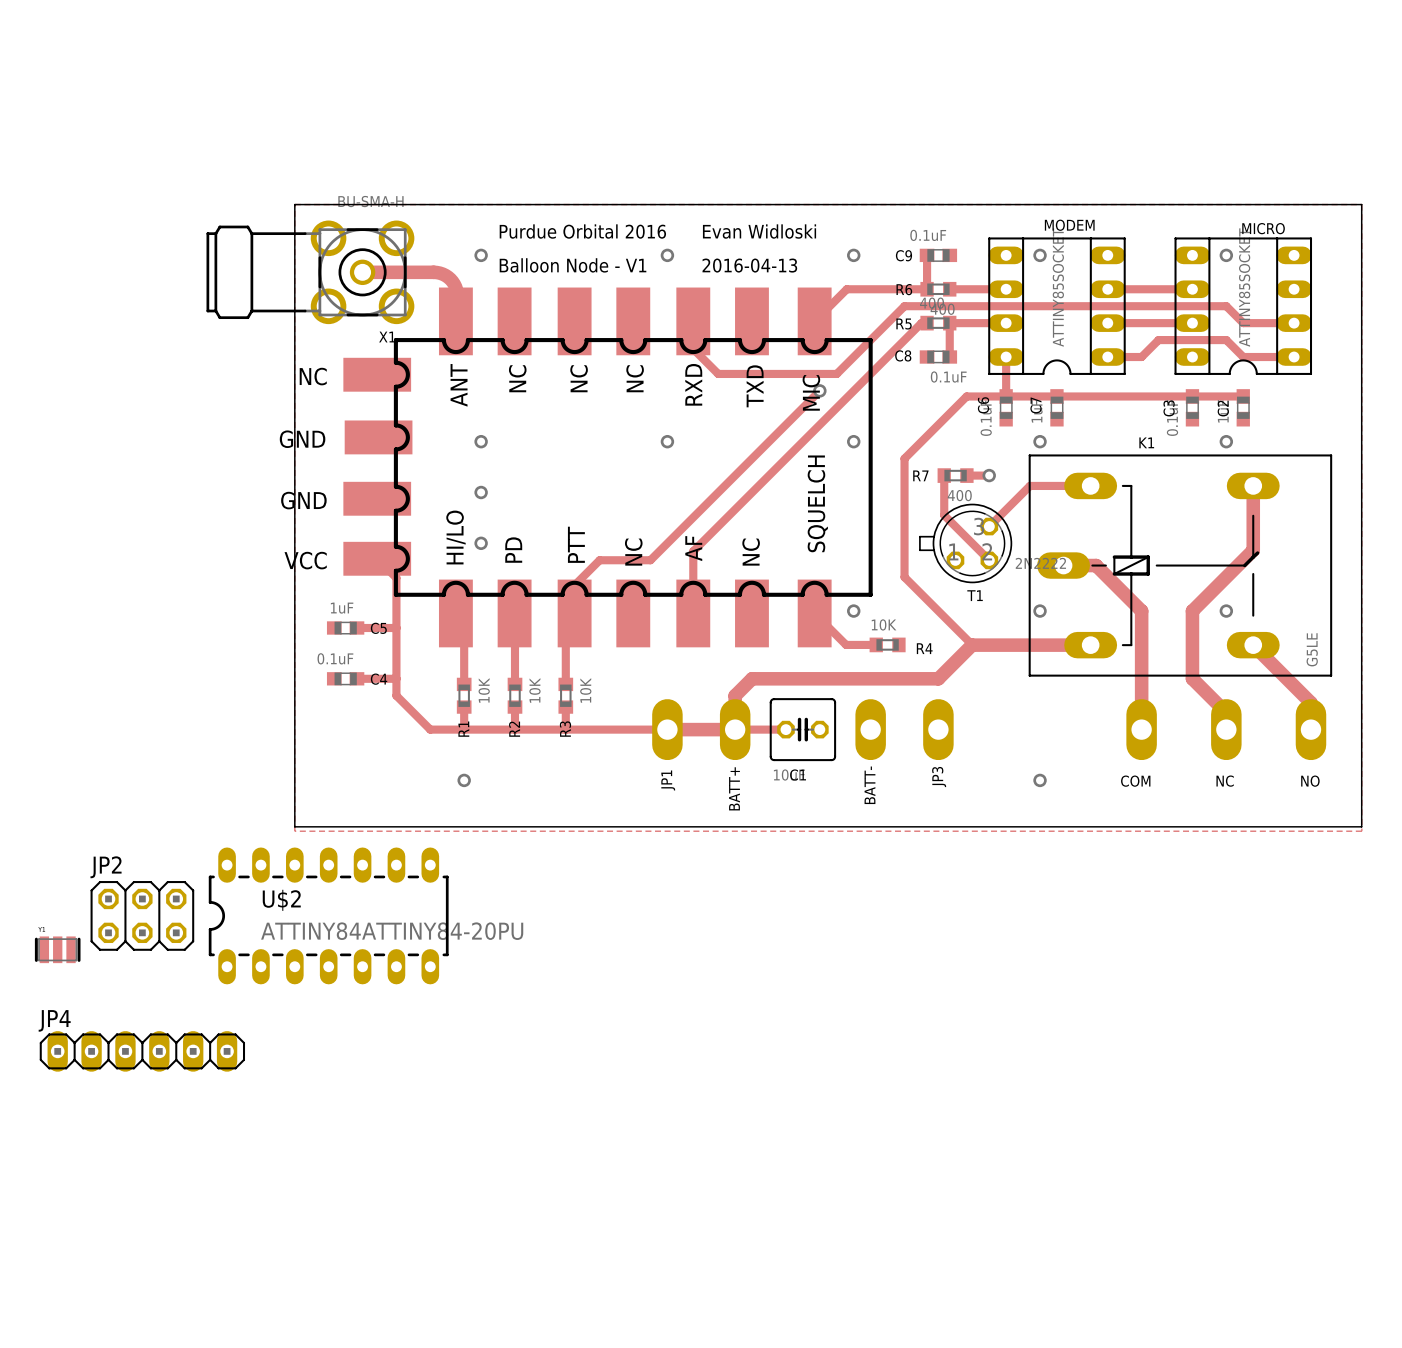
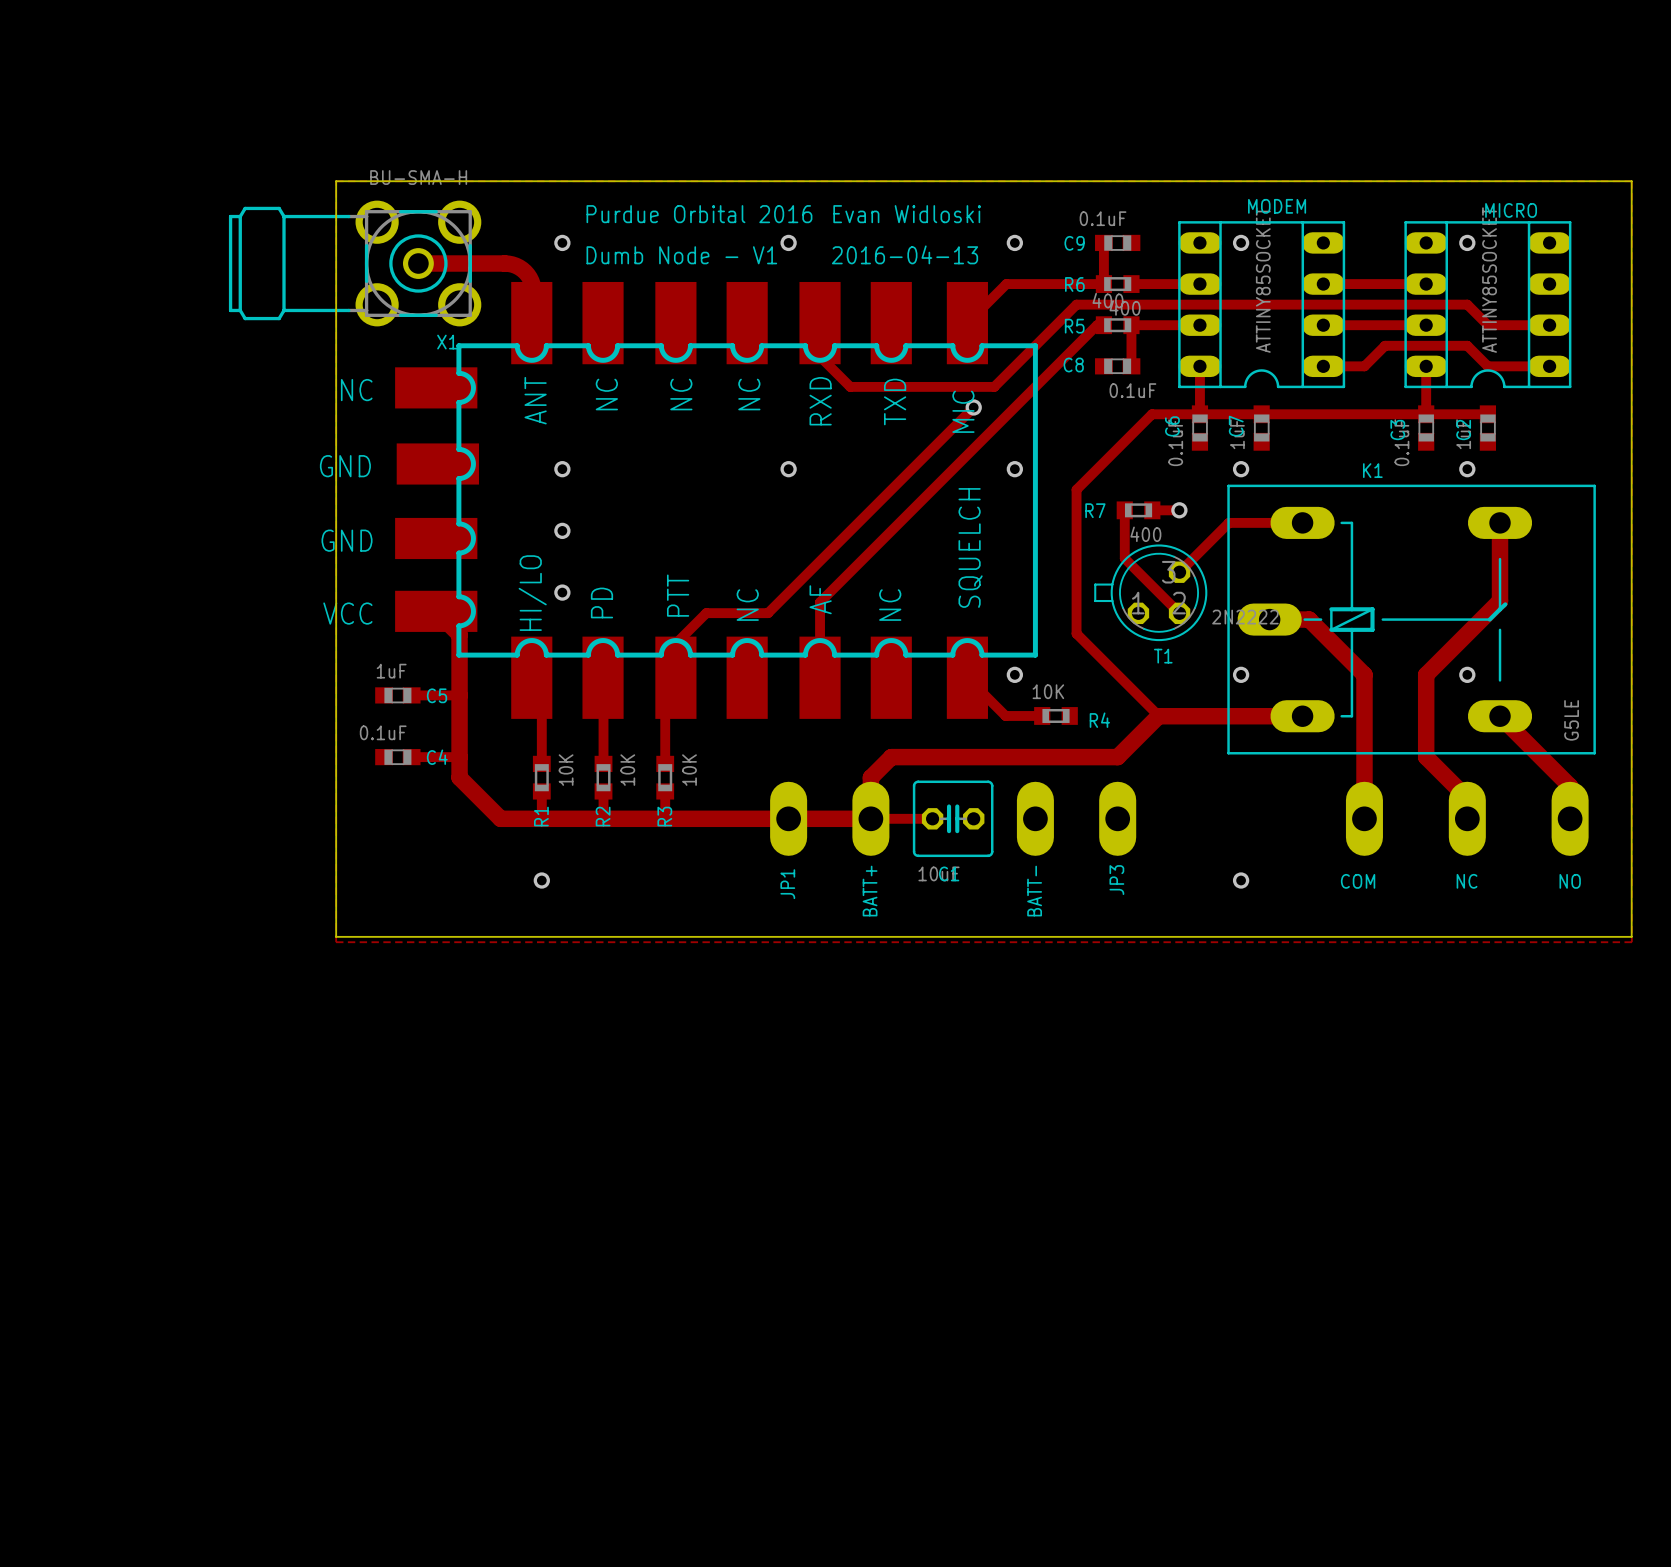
text: Balloon Node - V1 (573, 265) -> Dumb Node - V1 (681, 255)
track: none -> (1426, 366) (1426, 414)
track width: thin (379, 561) (396, 577) (396, 695) (430, 729) (667, 729) -> thick (438, 614) (459, 634) (459, 777) (500, 818) (788, 818)
JP2: (142, 915) -> none
U$2: ATTINY84ATTINY84-20PU (328, 915) -> none
part: (57, 949) -> none
JP4: (142, 1051) -> none

